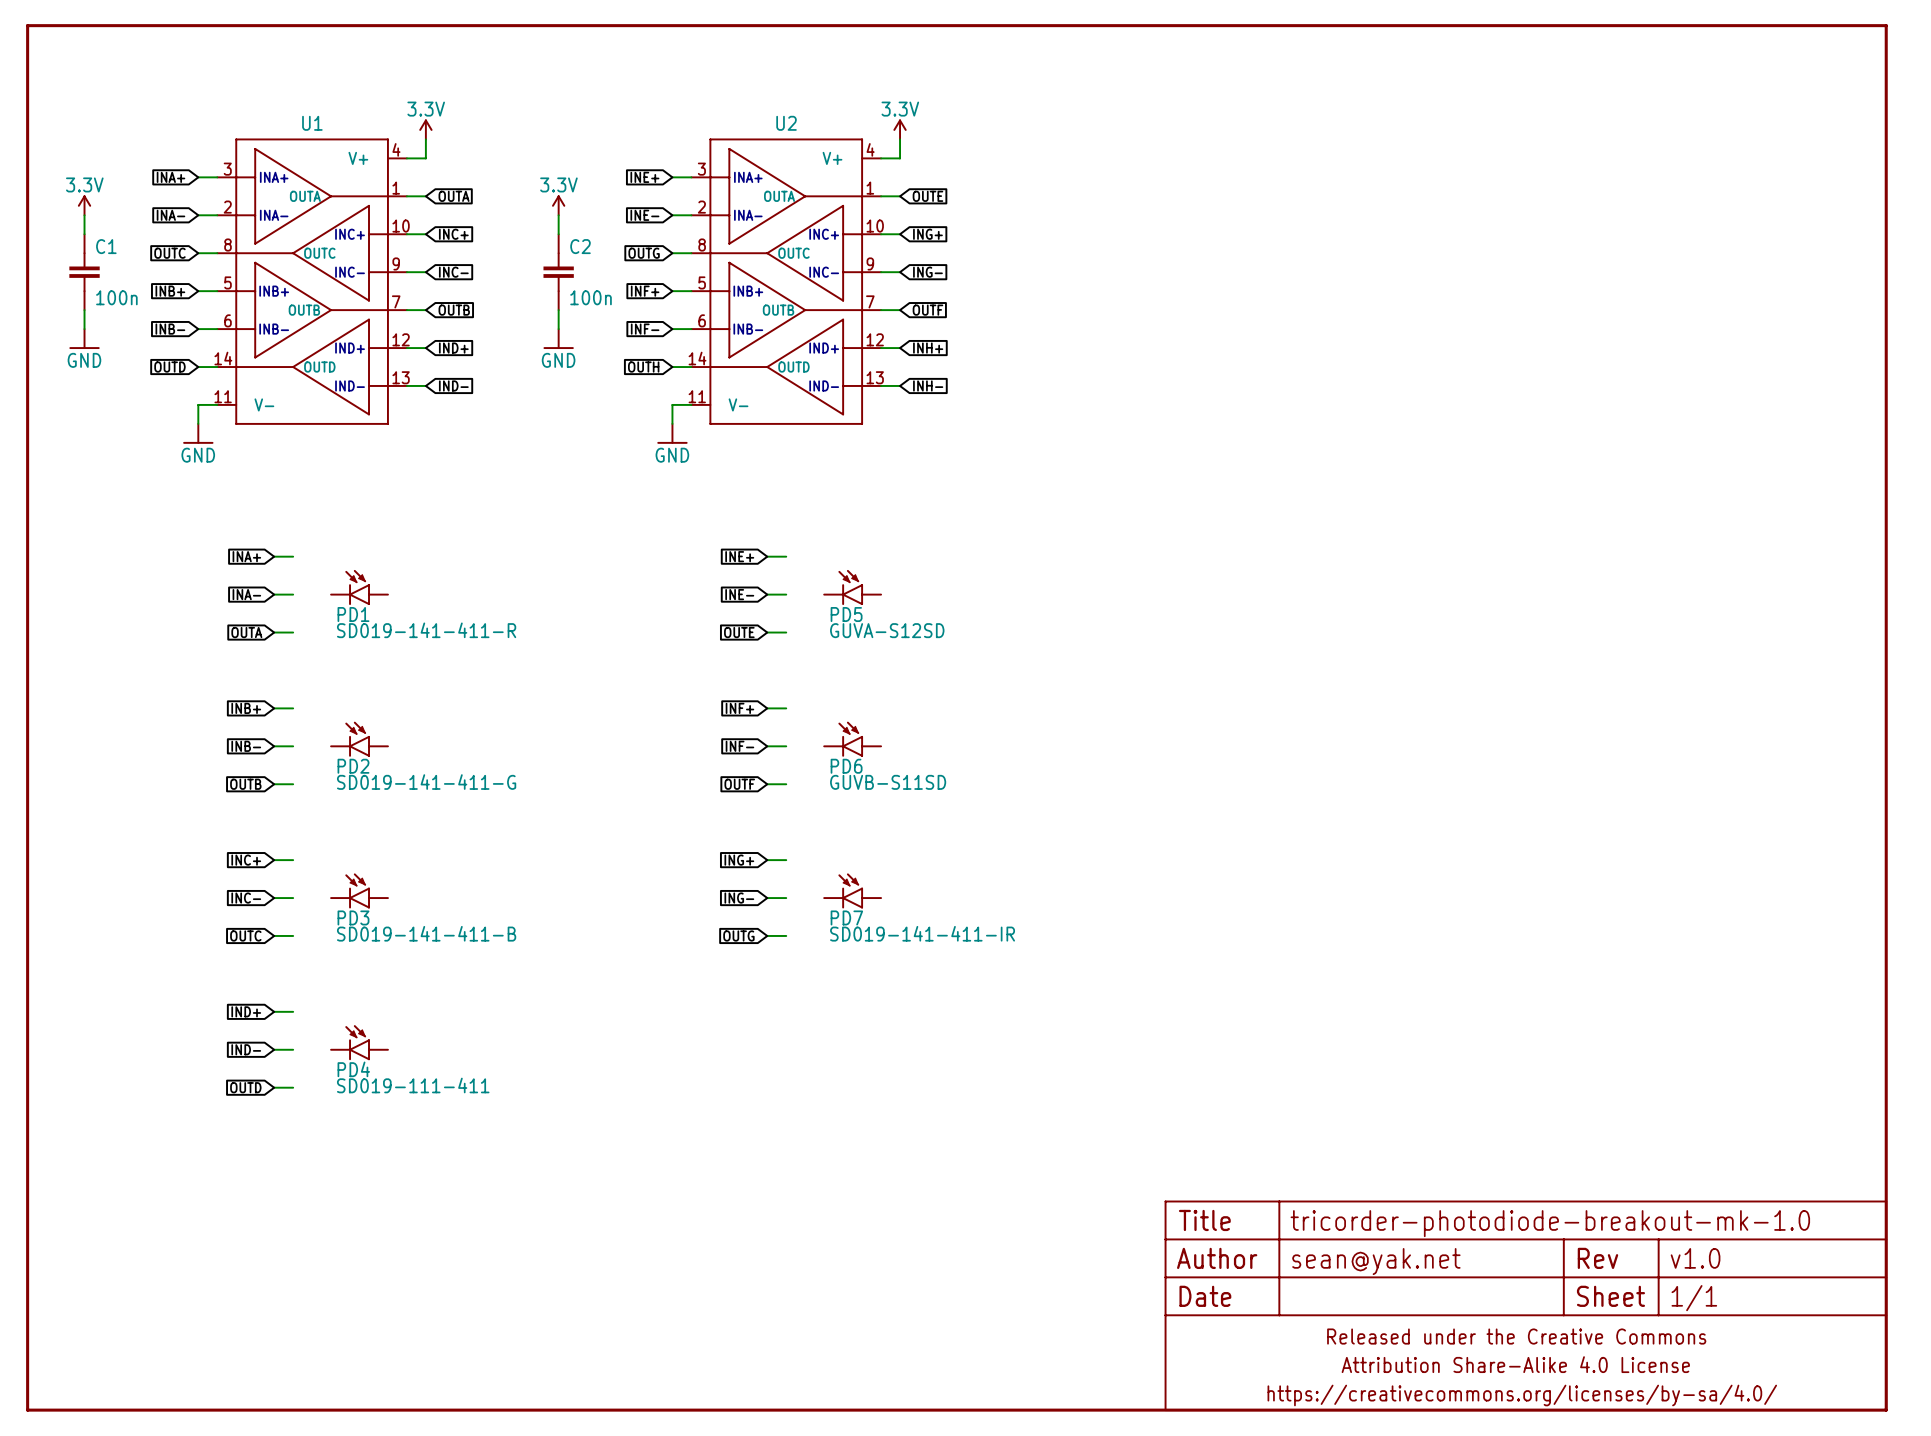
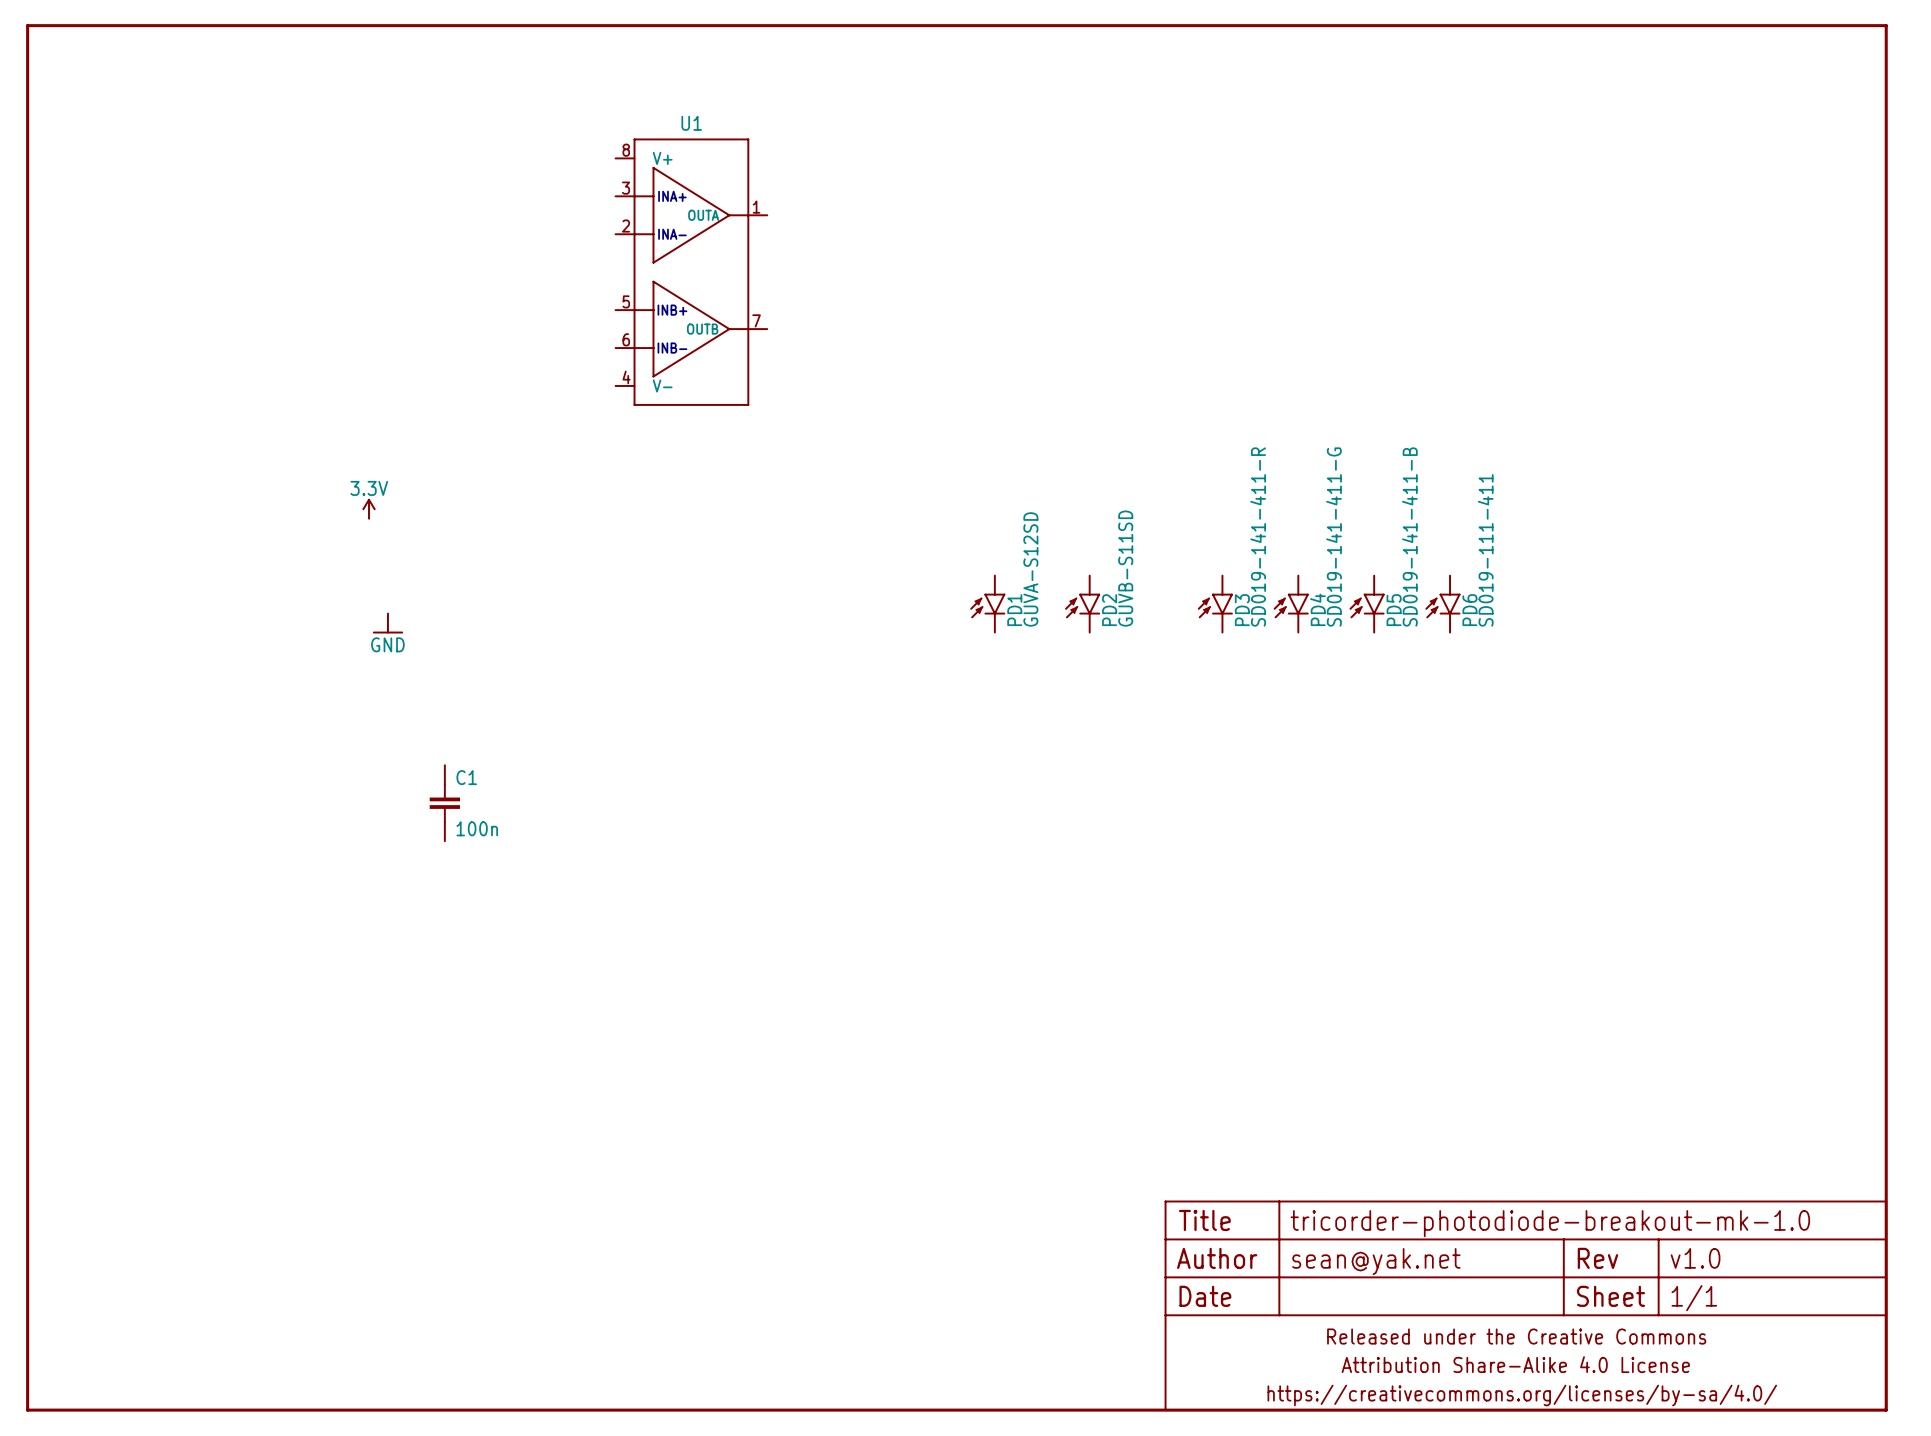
power symbol: 3.3V (425, 129) -> none
power symbol: 3.3V (900, 129) -> none
U1 symbol: [217, 138, 407, 425] -> [615, 138, 768, 406]
wire: (425, 139) (425, 158) (406, 158) -> none
wire: (900, 139) (900, 158) (881, 158) -> none
global label: INA+ (170, 177) -> none
wire: (198, 177) (217, 177) -> none
global label: INE+ (644, 177) -> none
wire: (672, 177) (691, 177) -> none
wire: (406, 196) (425, 196) -> none
global label: OUTA (454, 196) -> none
wire: (881, 196) (900, 196) -> none
global label: OUTE (927, 196) -> none
power symbol: 3.3V (84, 205) -> none
power symbol: 3.3V (558, 205) -> none
wire: (84, 215) (84, 234) -> none
global label: INA- (170, 215) -> none
wire: (198, 215) (217, 215) -> none
wire: (558, 215) (558, 234) -> none
global label: INE- (644, 215) -> none
wire: (672, 215) (691, 215) -> none
wire: (406, 234) (425, 234) -> none
global label: INC+ (453, 234) -> none
wire: (881, 234) (900, 234) -> none
global label: ING+ (927, 234) -> none
global label: OUTC (169, 253) -> none
wire: (198, 253) (217, 253) -> none
global label: OUTG (644, 253) -> none
wire: (672, 253) (691, 253) -> none
C1 position: (84, 272) -> (444, 803)
wire: (406, 272) (425, 272) -> none
global label: INC- (453, 272) -> none
C2: 100n (558, 272) -> none
wire: (881, 272) (900, 272) -> none
global label: ING- (927, 272) -> none
U2: (786, 281) -> none
global label: INB+ (170, 291) -> none
wire: (198, 291) (217, 291) -> none
global label: INF+ (645, 291) -> none
wire: (672, 291) (691, 291) -> none
wire: (84, 310) (84, 329) -> none
wire: (406, 310) (425, 310) -> none
global label: OUTB (454, 310) -> none
wire: (558, 310) (558, 329) -> none
wire: (881, 310) (900, 310) -> none
global label: OUTF (927, 310) -> none
global label: INB- (170, 329) -> none
wire: (198, 329) (217, 329) -> none
global label: INF- (645, 329) -> none
wire: (672, 329) (691, 329) -> none
power symbol: GND (84, 339) -> none
power symbol: GND (558, 339) -> none
wire: (406, 348) (425, 348) -> none
global label: IND+ (453, 348) -> none
wire: (881, 348) (900, 348) -> none
global label: INH+ (928, 348) -> none
global label: OUTD (169, 367) -> none
wire: (198, 367) (217, 367) -> none
global label: OUTH (643, 367) -> none
wire: (672, 367) (691, 367) -> none
wire: (406, 385) (425, 385) -> none
global label: IND- (453, 385) -> none
wire: (881, 385) (900, 385) -> none
global label: INH- (928, 385) -> none
wire: (217, 404) (198, 404) (198, 423) -> none
wire: (691, 404) (672, 404) (672, 423) -> none
power symbol: GND (198, 433) -> none
power symbol: GND (672, 433) -> none
power symbol: none -> 3.3V (369, 508)
global label: INA+ (246, 556) -> none
wire: (274, 556) (293, 556) -> none
global label: INE+ (739, 556) -> none
wire: (767, 556) (786, 556) -> none
PD1 rotation: 0° (357, 587) -> 90° counterclockwise (987, 605)
PD1 position: (359, 587) -> (987, 604)
PD5 rotation: 0° (850, 587) -> 90° counterclockwise (1367, 605)
PD5 position: (852, 587) -> (1367, 604)
global label: INA- (246, 594) -> none
wire: (274, 594) (293, 594) -> none
global label: INE- (739, 594) -> none
wire: (767, 594) (786, 594) -> none
power symbol: none -> GND (387, 623)
PD1 value: SD019-141-411-R (426, 630) -> GUVA-S12SD (1030, 569)
PD5 value: GUVA-S12SD (887, 630) -> SD019-141-411-B (1409, 537)
global label: OUTA (246, 632) -> none
wire: (274, 632) (293, 632) -> none
global label: OUTE (739, 632) -> none
wire: (767, 632) (786, 632) -> none
global label: INB+ (246, 708) -> none
wire: (274, 708) (293, 708) -> none
global label: INF+ (739, 708) -> none
wire: (767, 708) (786, 708) -> none
PD2 rotation: 0° (357, 739) -> 90° counterclockwise (1082, 605)
PD2 position: (359, 739) -> (1082, 604)
PD6 rotation: 0° (850, 739) -> 90° counterclockwise (1443, 605)
PD6 position: (852, 739) -> (1443, 604)
global label: INB- (246, 746) -> none
wire: (274, 746) (293, 746) -> none
global label: INF- (739, 746) -> none
wire: (767, 746) (786, 746) -> none
PD2 value: SD019-141-411-G (426, 782) -> GUVB-S11SD (1125, 568)
PD6 value: GUVB-S11SD (888, 782) -> SD019-111-411 (1485, 550)
global label: OUTB (245, 784) -> none
wire: (274, 784) (293, 784) -> none
global label: OUTF (739, 784) -> none
wire: (767, 784) (786, 784) -> none
global label: INC+ (246, 860) -> none
wire: (274, 860) (293, 860) -> none
global label: ING+ (739, 860) -> none
wire: (767, 860) (786, 860) -> none
PD3 rotation: 0° (357, 891) -> 90° counterclockwise (1215, 605)
PD3 position: (359, 891) -> (1215, 604)
PD7: SD019-141-411-IR (852, 891) -> none
global label: INC- (246, 898) -> none
wire: (274, 898) (293, 898) -> none
global label: ING- (739, 898) -> none
wire: (767, 898) (786, 898) -> none
PD3 value: SD019-141-411-B (426, 933) -> SD019-141-411-R (1258, 537)
global label: OUTC (245, 935) -> none
wire: (274, 935) (293, 935) -> none
global label: OUTG (738, 935) -> none
wire: (767, 935) (786, 935) -> none
global label: IND+ (246, 1011) -> none
wire: (274, 1011) (293, 1011) -> none
PD4 rotation: 0° (357, 1042) -> 90° counterclockwise (1291, 605)
PD4 position: (359, 1042) -> (1291, 604)
global label: IND- (246, 1049) -> none
wire: (274, 1049) (293, 1049) -> none
PD4 value: SD019-111-411 (413, 1085) -> SD019-141-411-G (1334, 537)
global label: OUTD (245, 1087) -> none
wire: (274, 1087) (293, 1087) -> none

